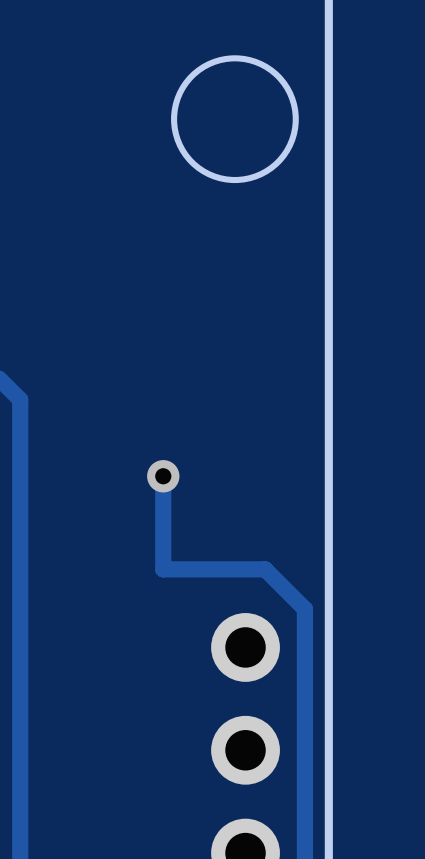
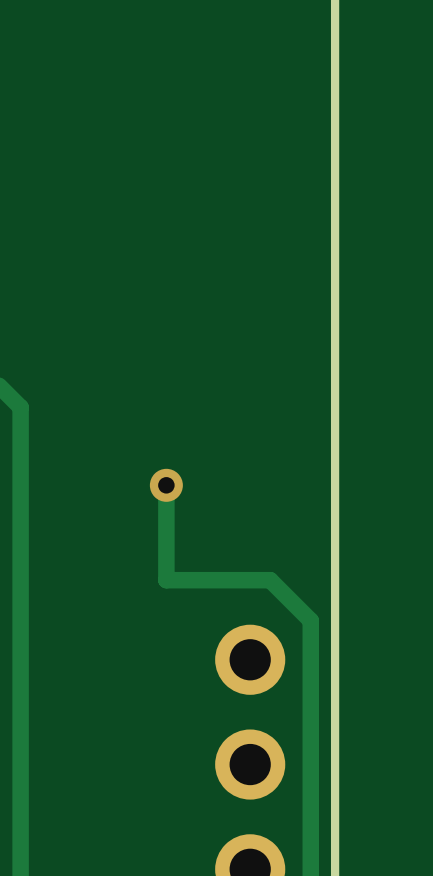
round board edge: [171, 55, 299, 184] -> none

